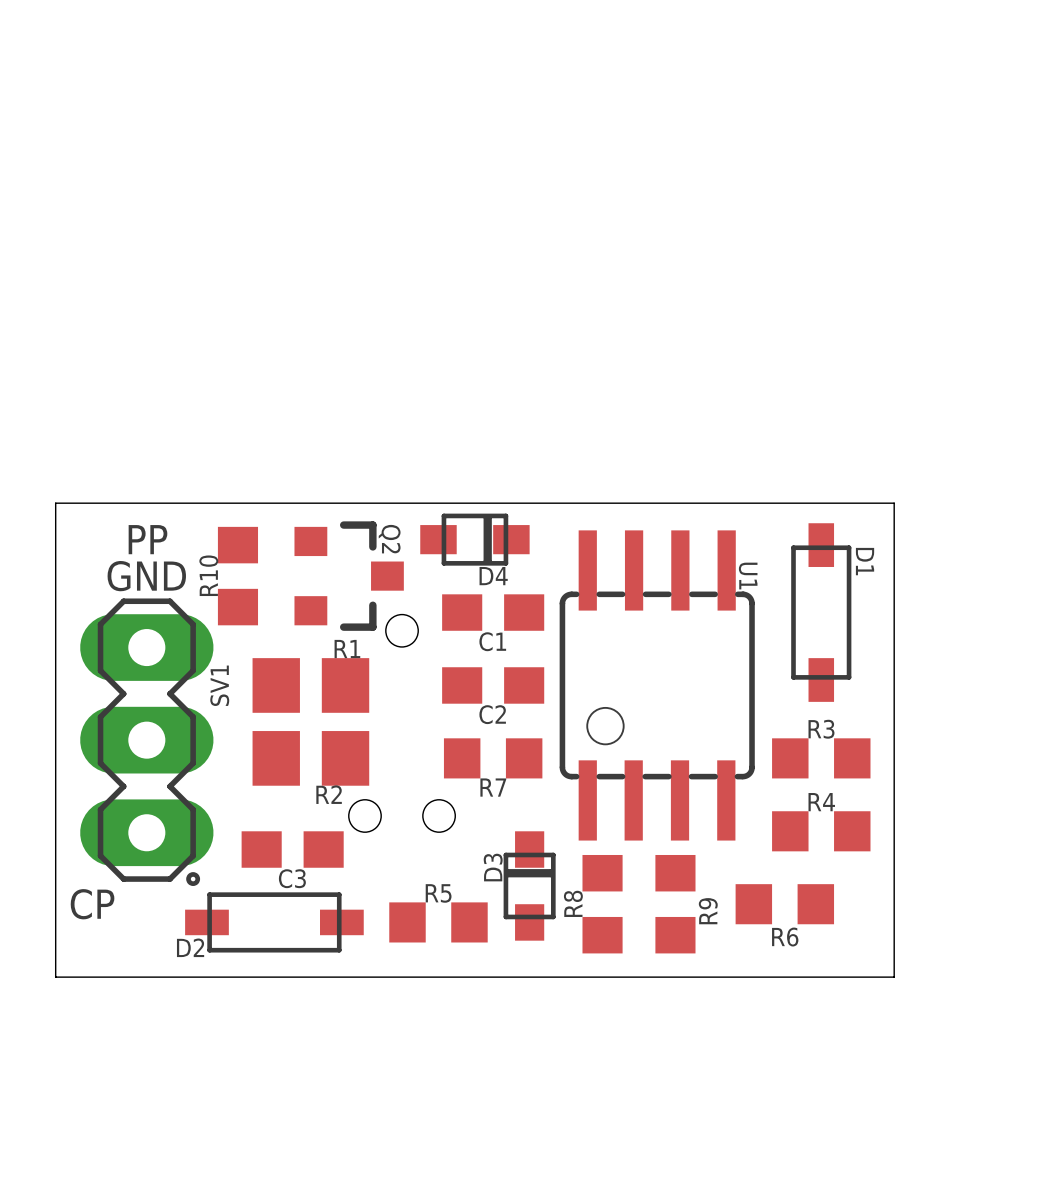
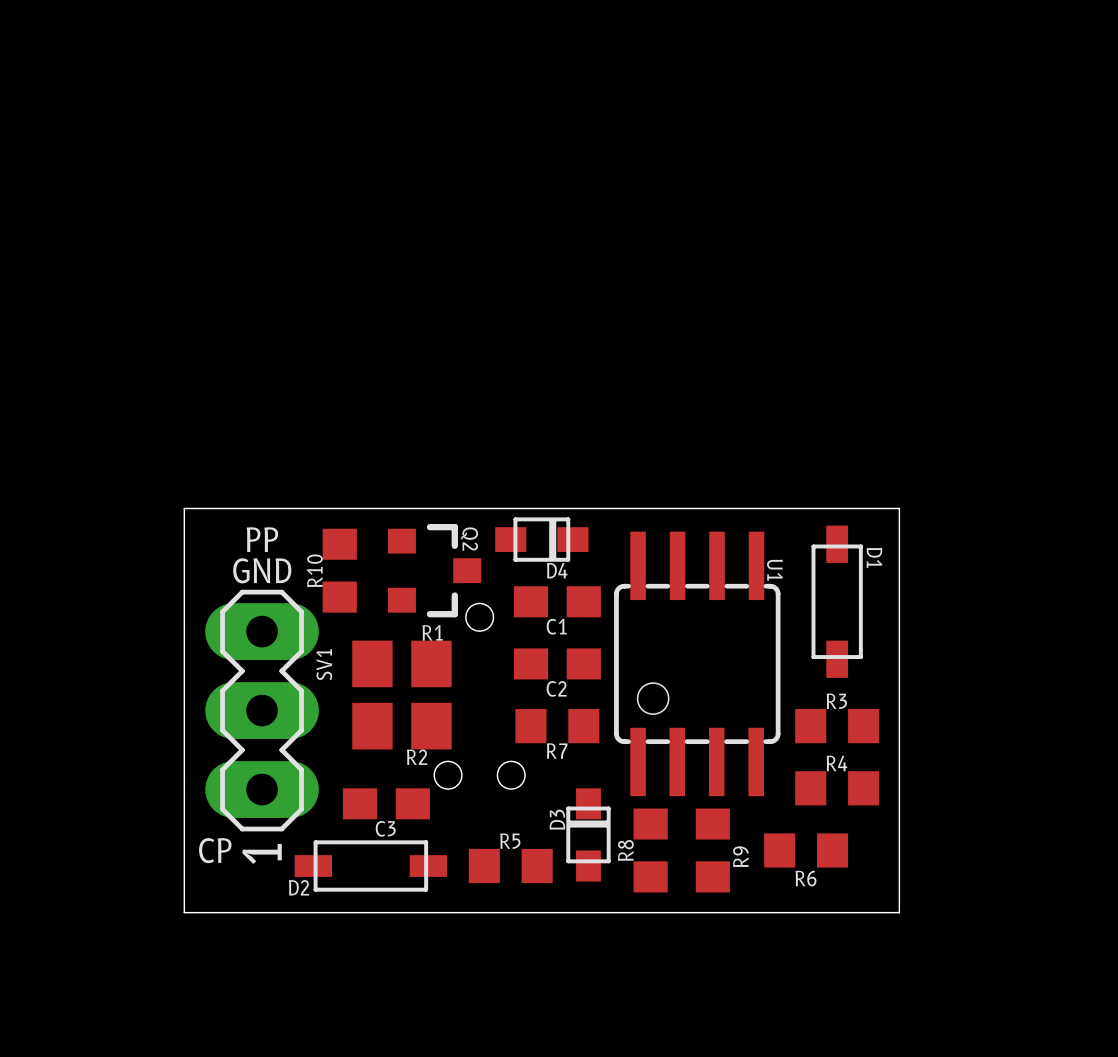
SV1 footprint: [80, 598, 214, 887] -> [205, 589, 319, 832]

